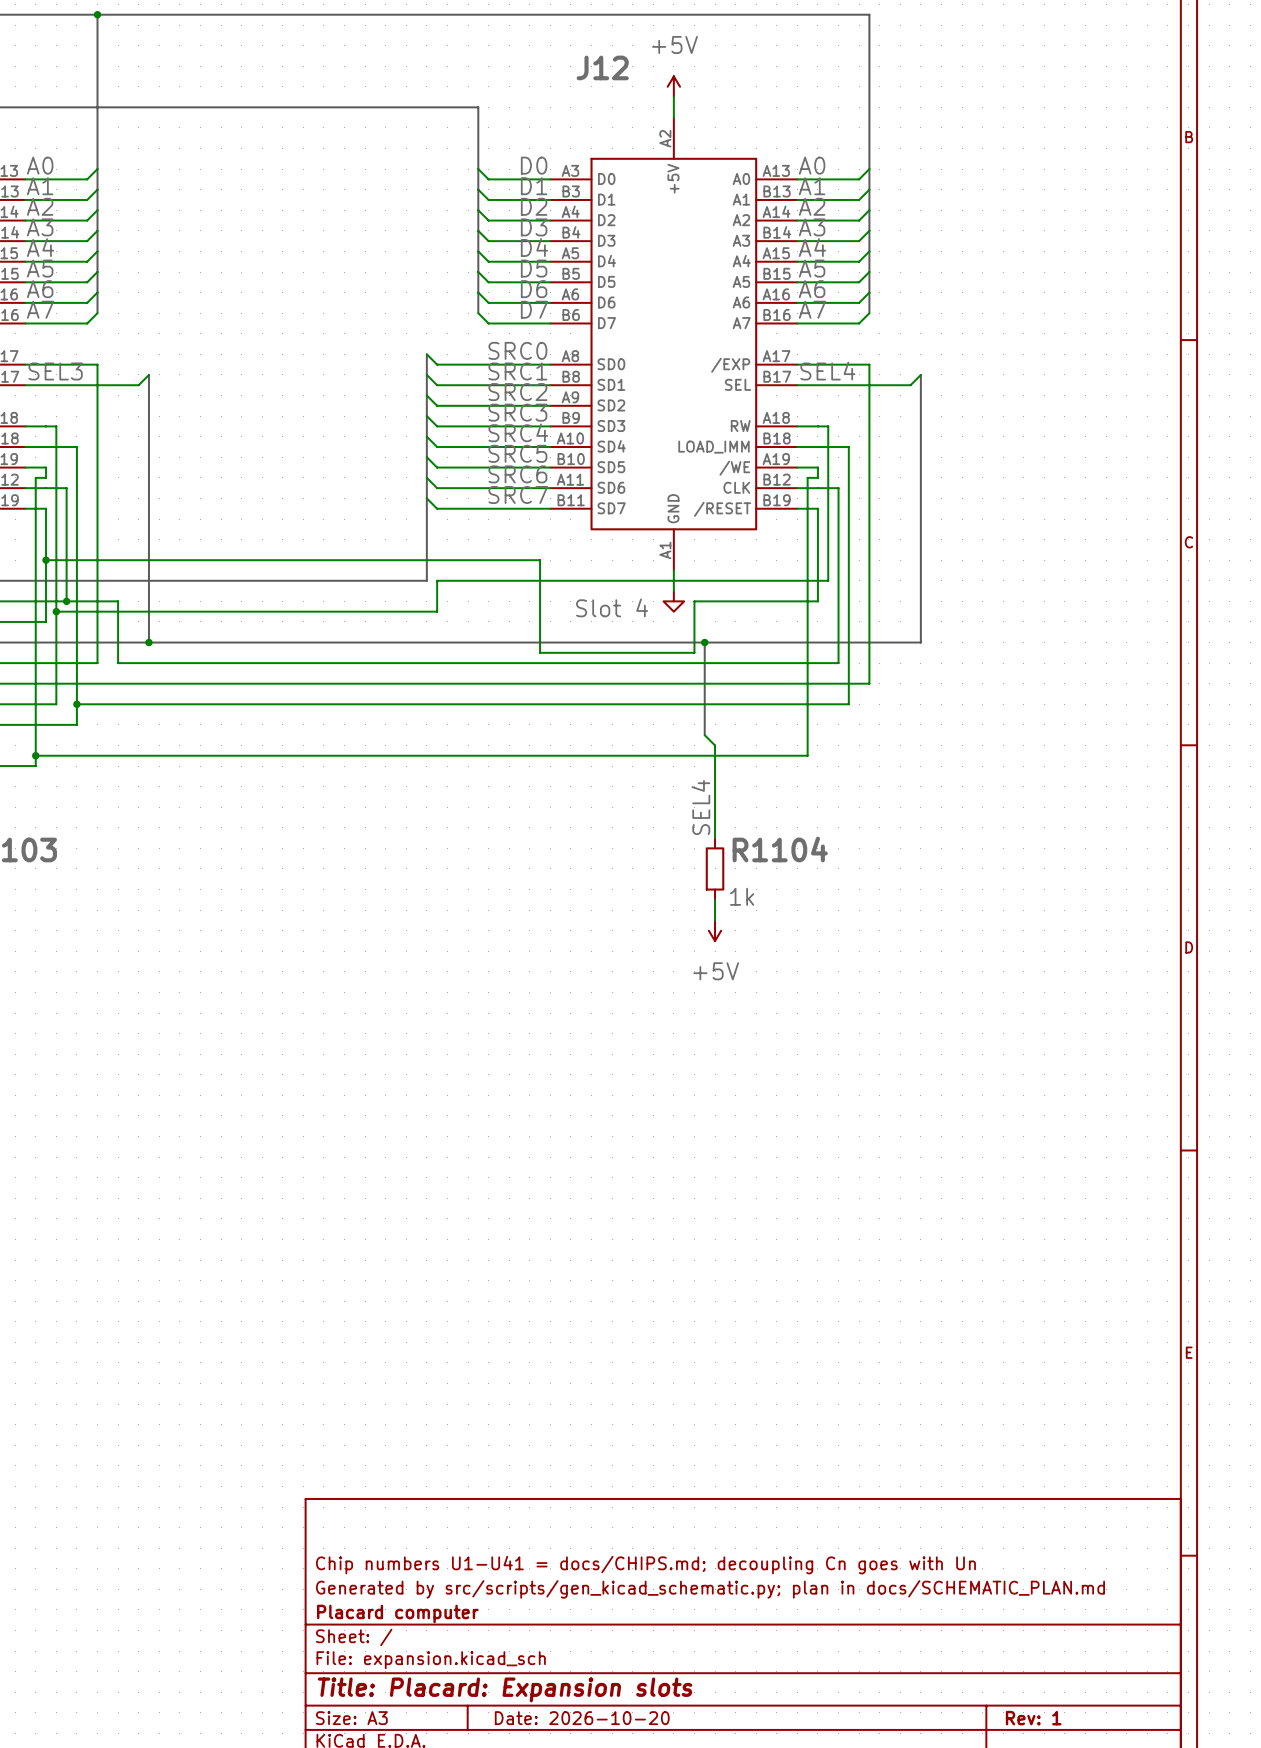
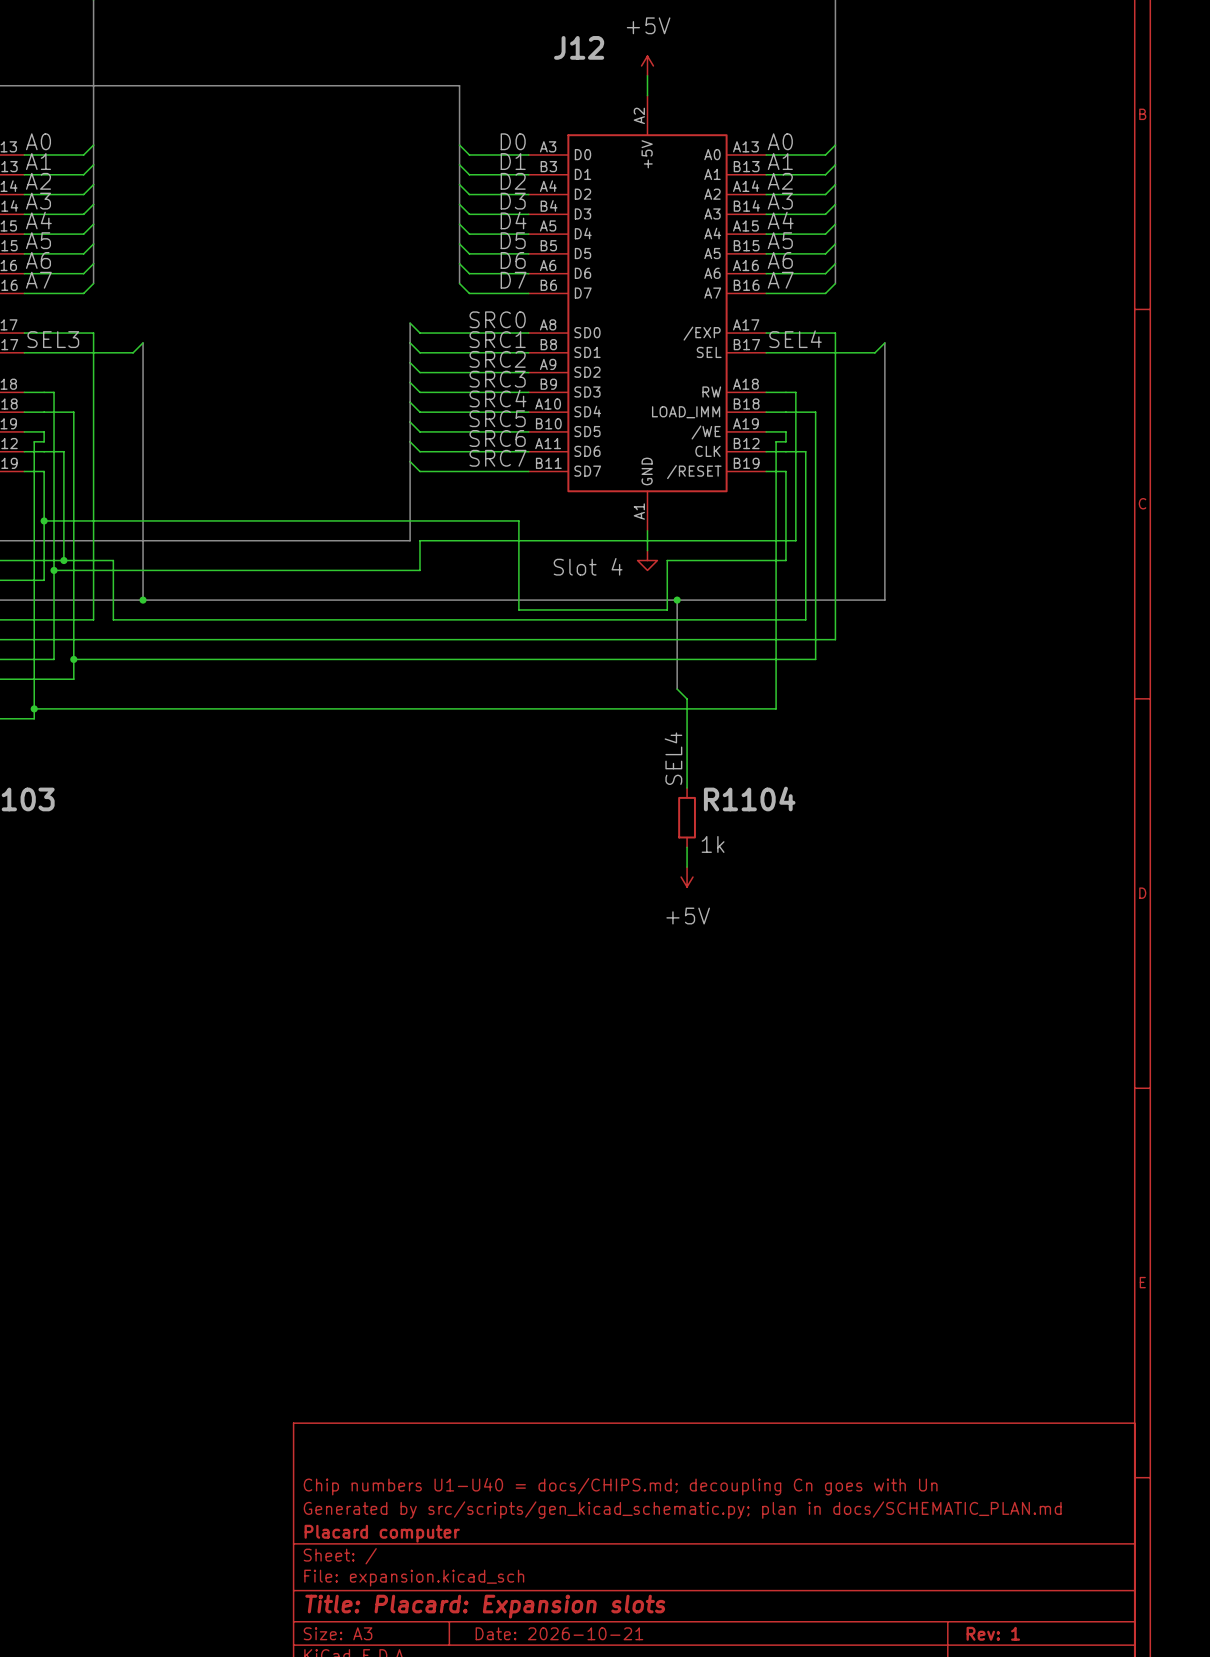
title block: Chip numbers U1-U41 = docs/CHIPS.md; decoupling Cn goes with Un (645, 1565) -> Chip numbers U1-U40 = docs/CHIPS.md; decoupling Cn goes with Un (620, 1486)
title block: Date: 2026-10-20 (582, 1718) -> Date: 2026-10-21 (559, 1633)

